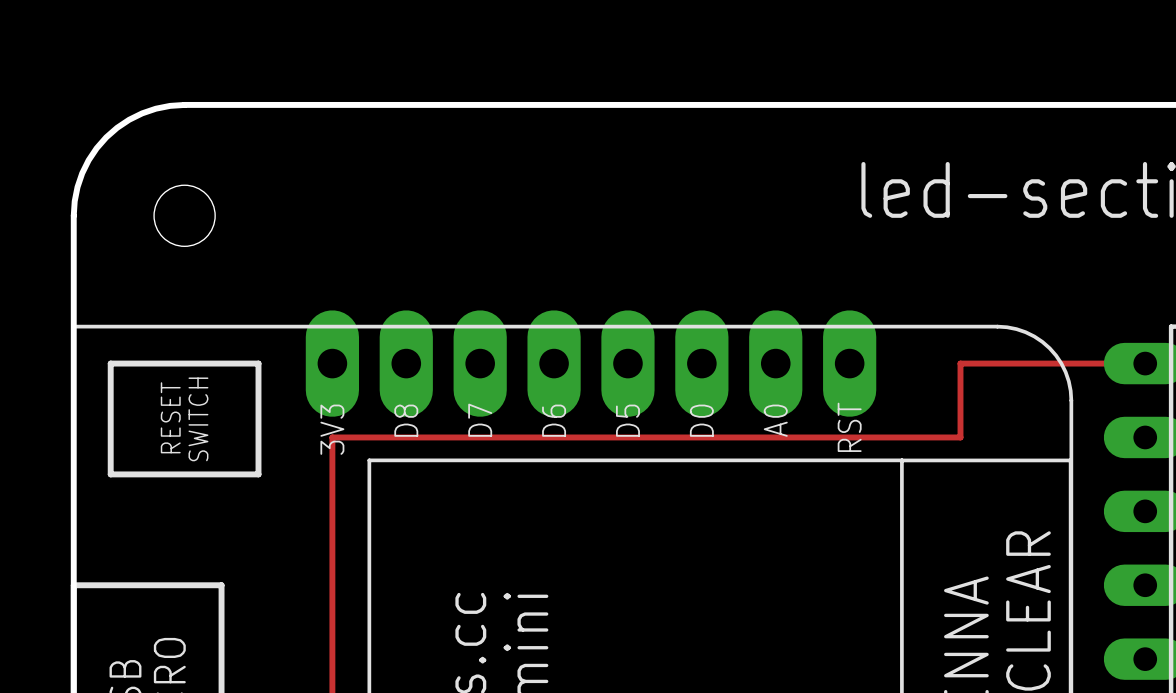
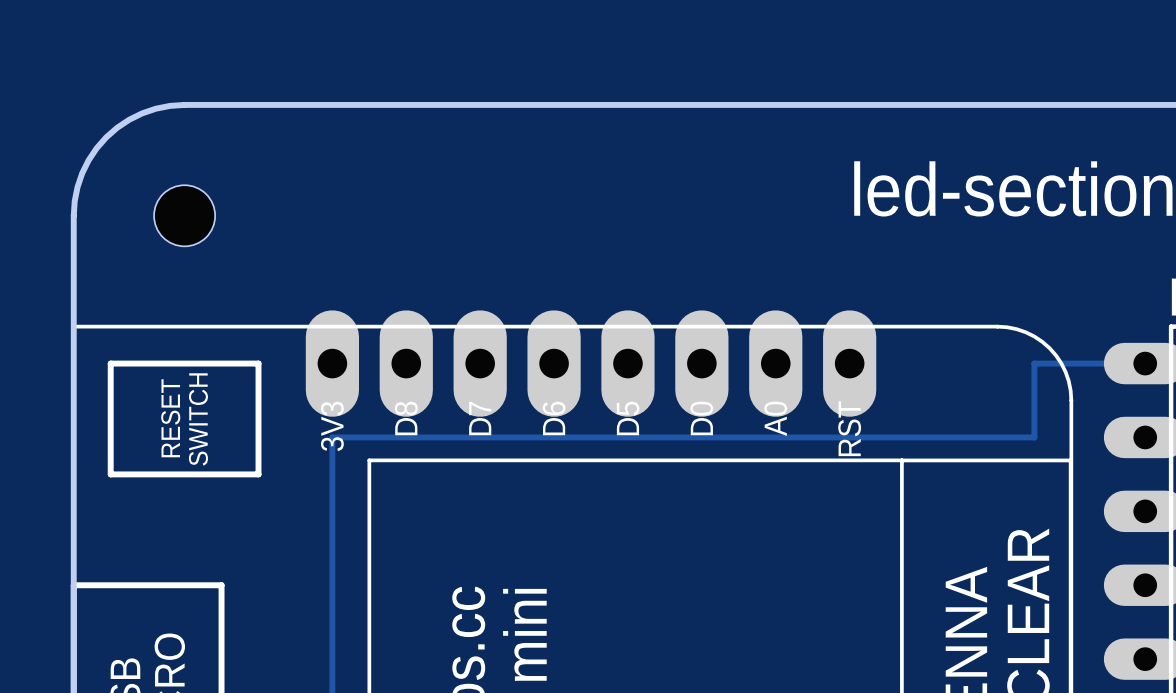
track: (1034, 363) (960, 363) (960, 437) -> (1034, 363) (1034, 437) (960, 437)

